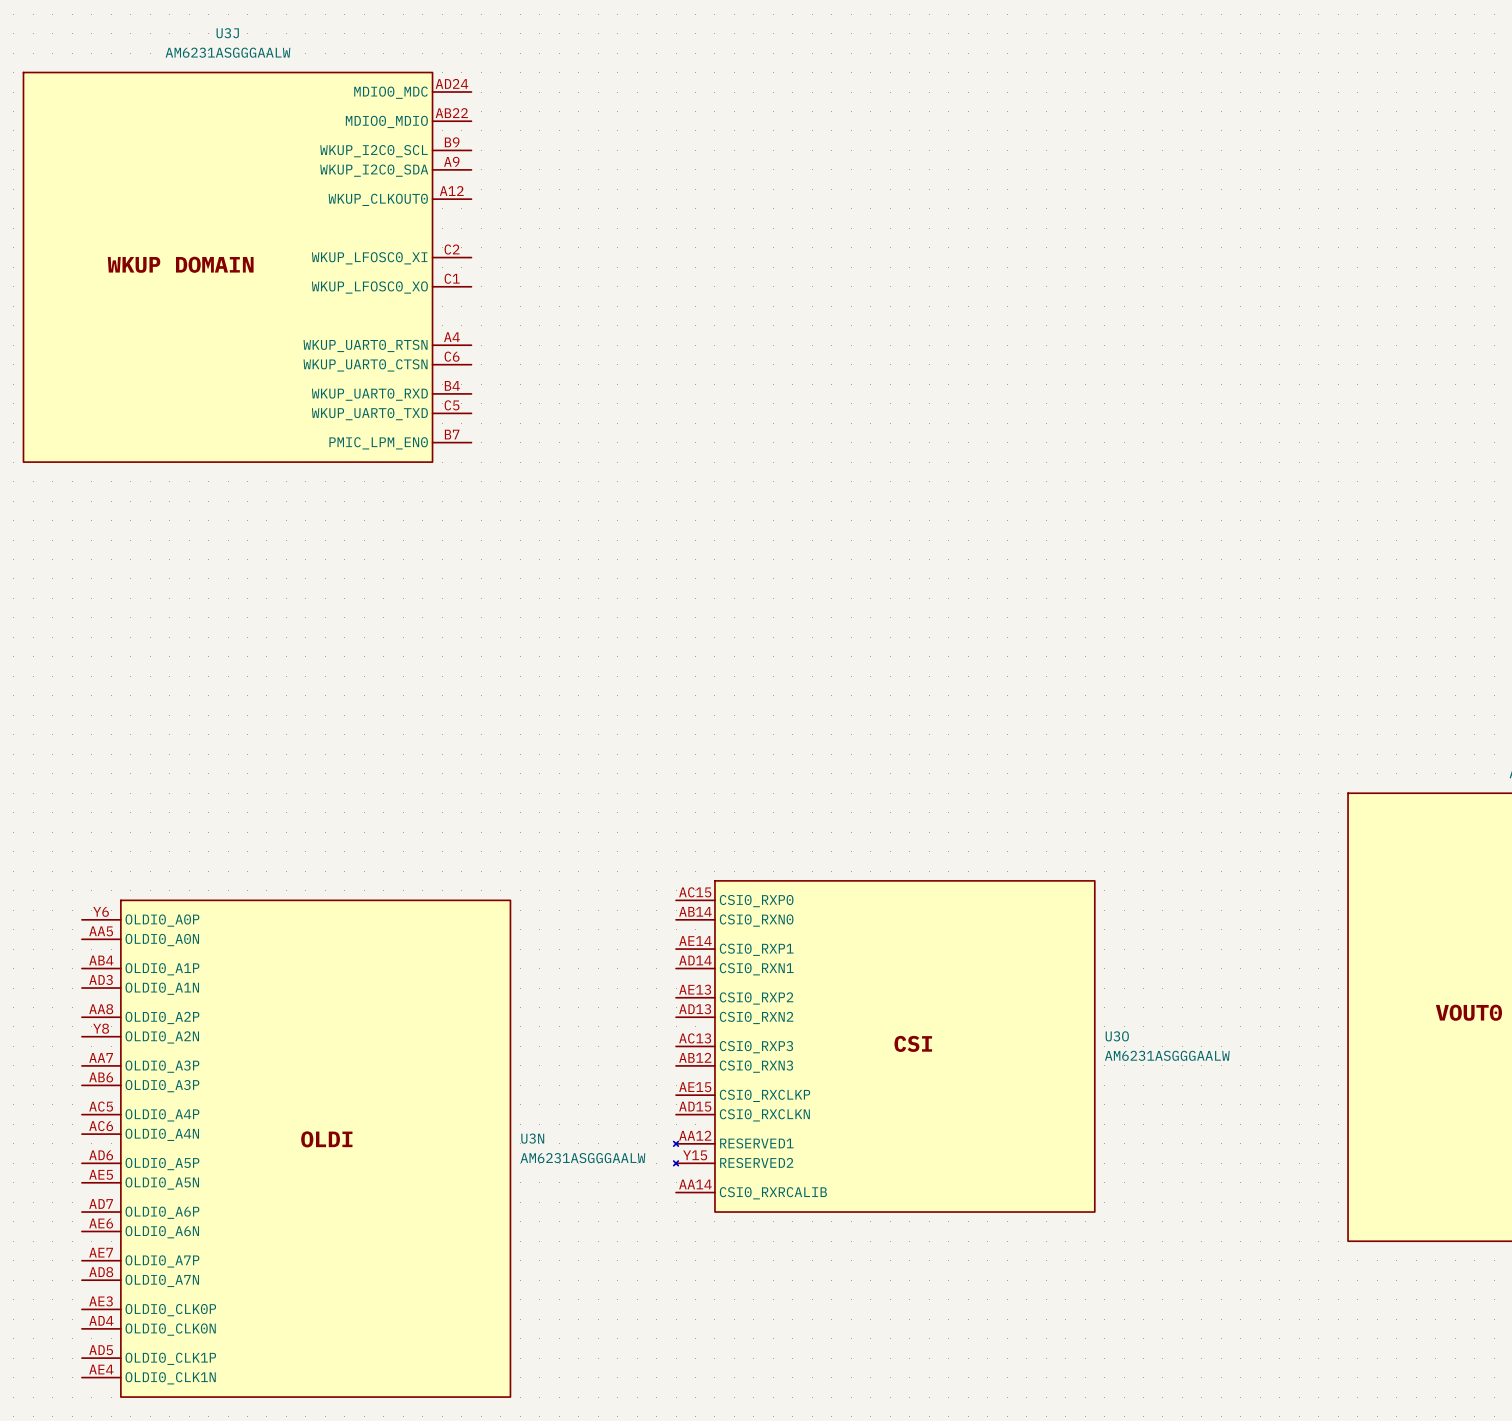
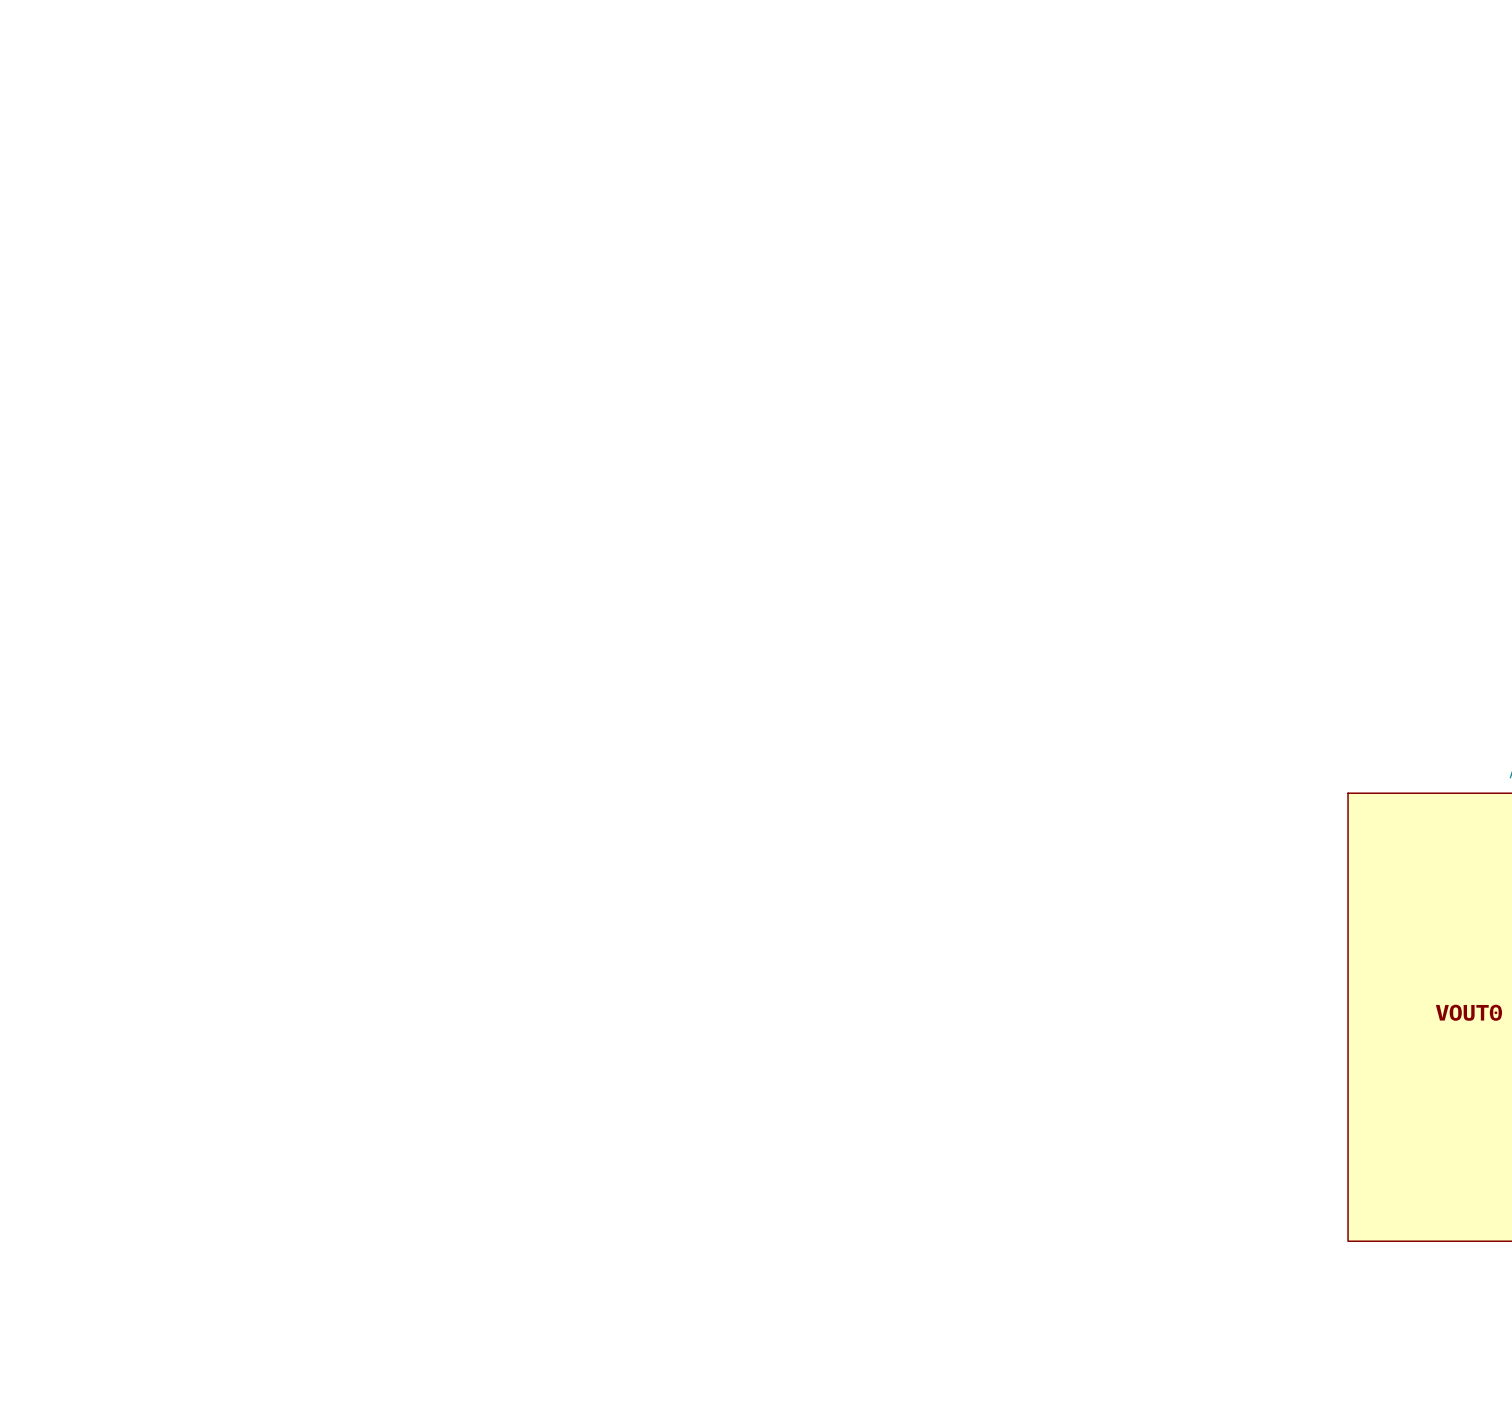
U3J: AM6231ASGGGAALW (247, 267) -> none
U3O: AM6231ASGGGAALW (884, 1046) -> none
U3N: AM6231ASGGGAALW (296, 1148) -> none

